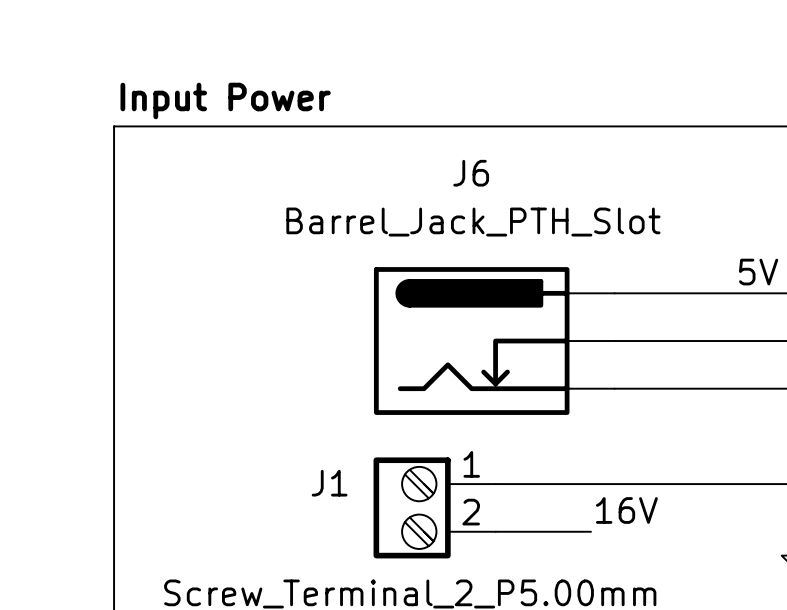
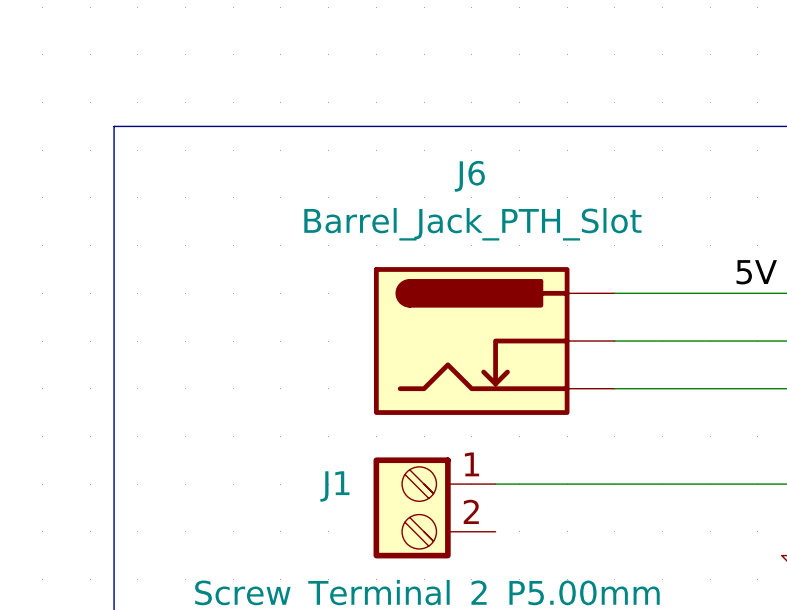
text: Input Power (225, 100) -> none
label: 16V (626, 510) -> none
wire: (495, 531) (590, 531) -> none

